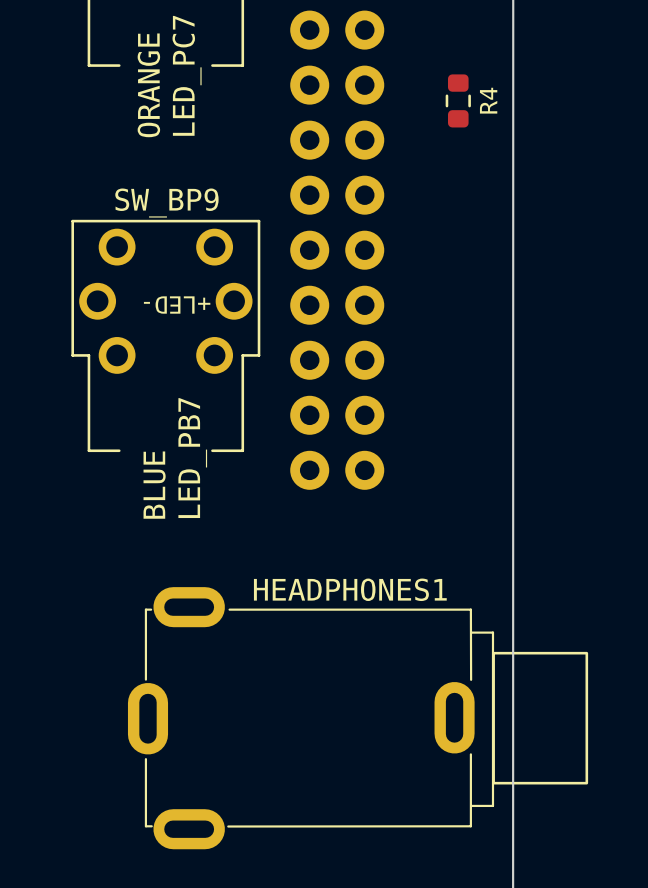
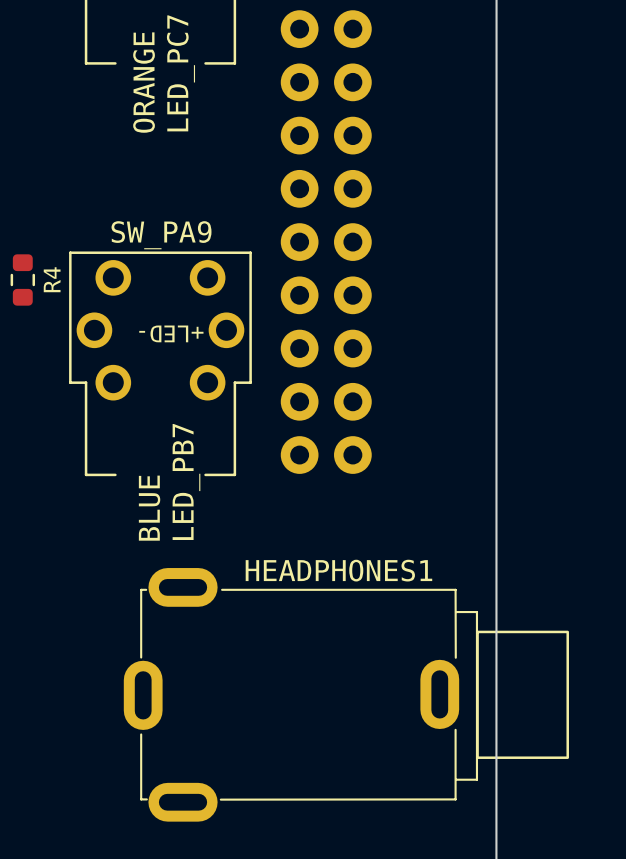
R4 position: (458, 100) -> (22, 279)
SW_BP9: (165, 335) -> none
SW_PA9: none -> (160, 363)
text position: LED_PB7 (192, 458) -> LED_PB7 (186, 482)
text position: BLUE (154, 485) -> BLUE (149, 508)

